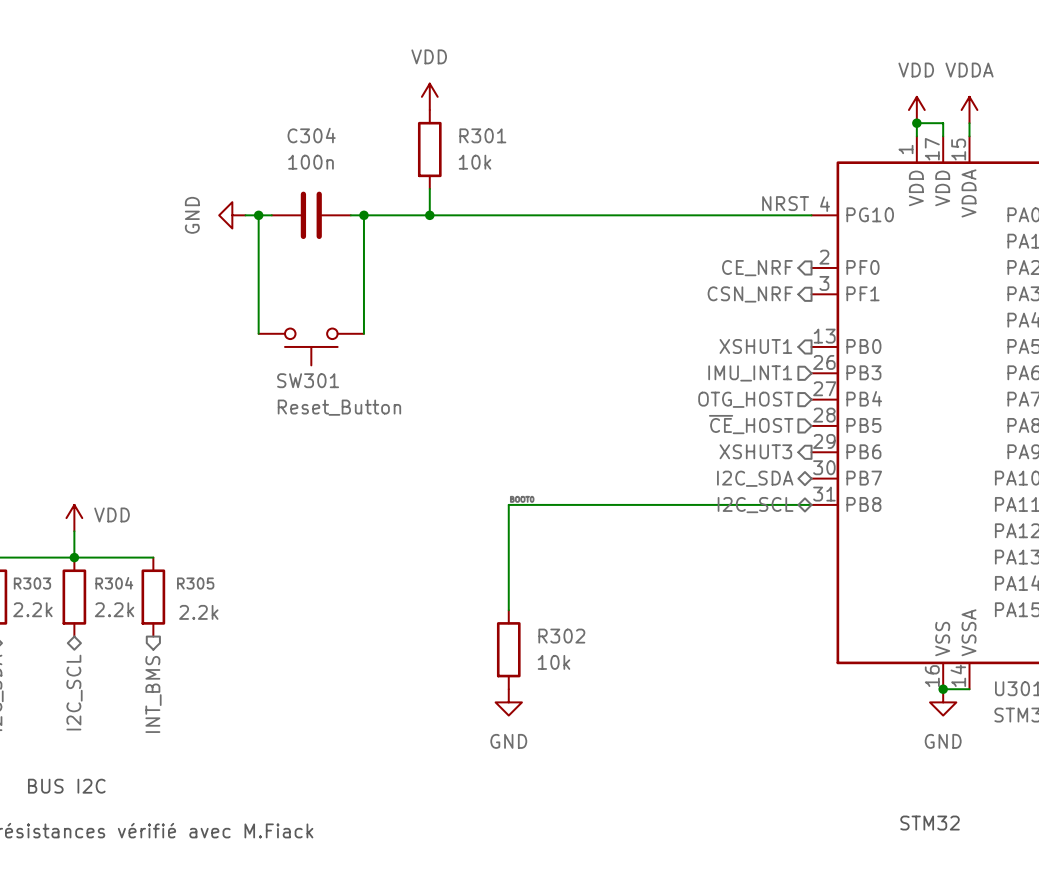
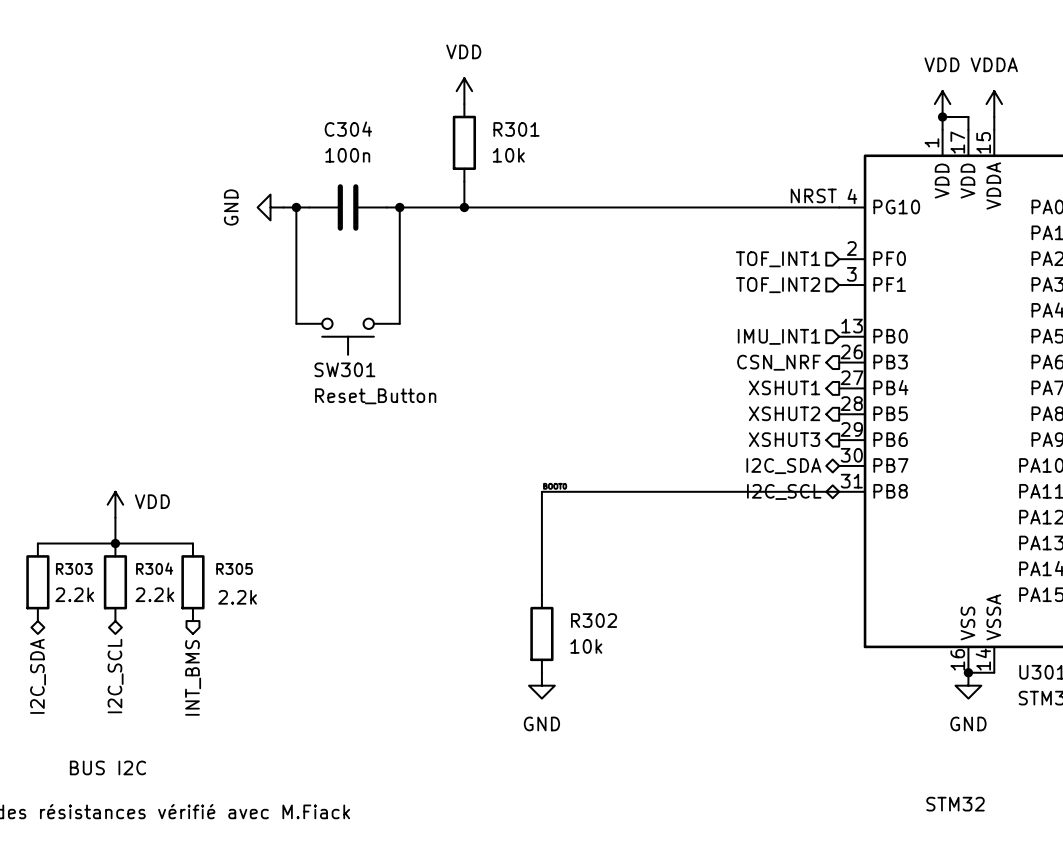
hierarchical label shape: output (757, 268) -> input (778, 259)
hierarchical label: CE_NRF (757, 268) -> TOF_INT1 (778, 259)
hierarchical label shape: output (750, 294) -> input (778, 285)
hierarchical label: CSN_NRF (750, 294) -> TOF_INT2 (778, 285)
hierarchical label shape: output (755, 346) -> input (778, 336)
hierarchical label: XSHUT1 (755, 346) -> IMU_INT1 (778, 336)
hierarchical label shape: input (750, 373) -> output (778, 362)
hierarchical label: IMU_INT1 (750, 373) -> CSN_NRF (778, 362)
hierarchical label shape: input (745, 399) -> output (784, 387)
hierarchical label: OTG_HOST (745, 399) -> XSHUT1 (784, 387)
hierarchical label shape: input (751, 424) -> output (784, 413)
hierarchical label: ~{CE}_HOST (751, 424) -> XSHUT2 (784, 413)

